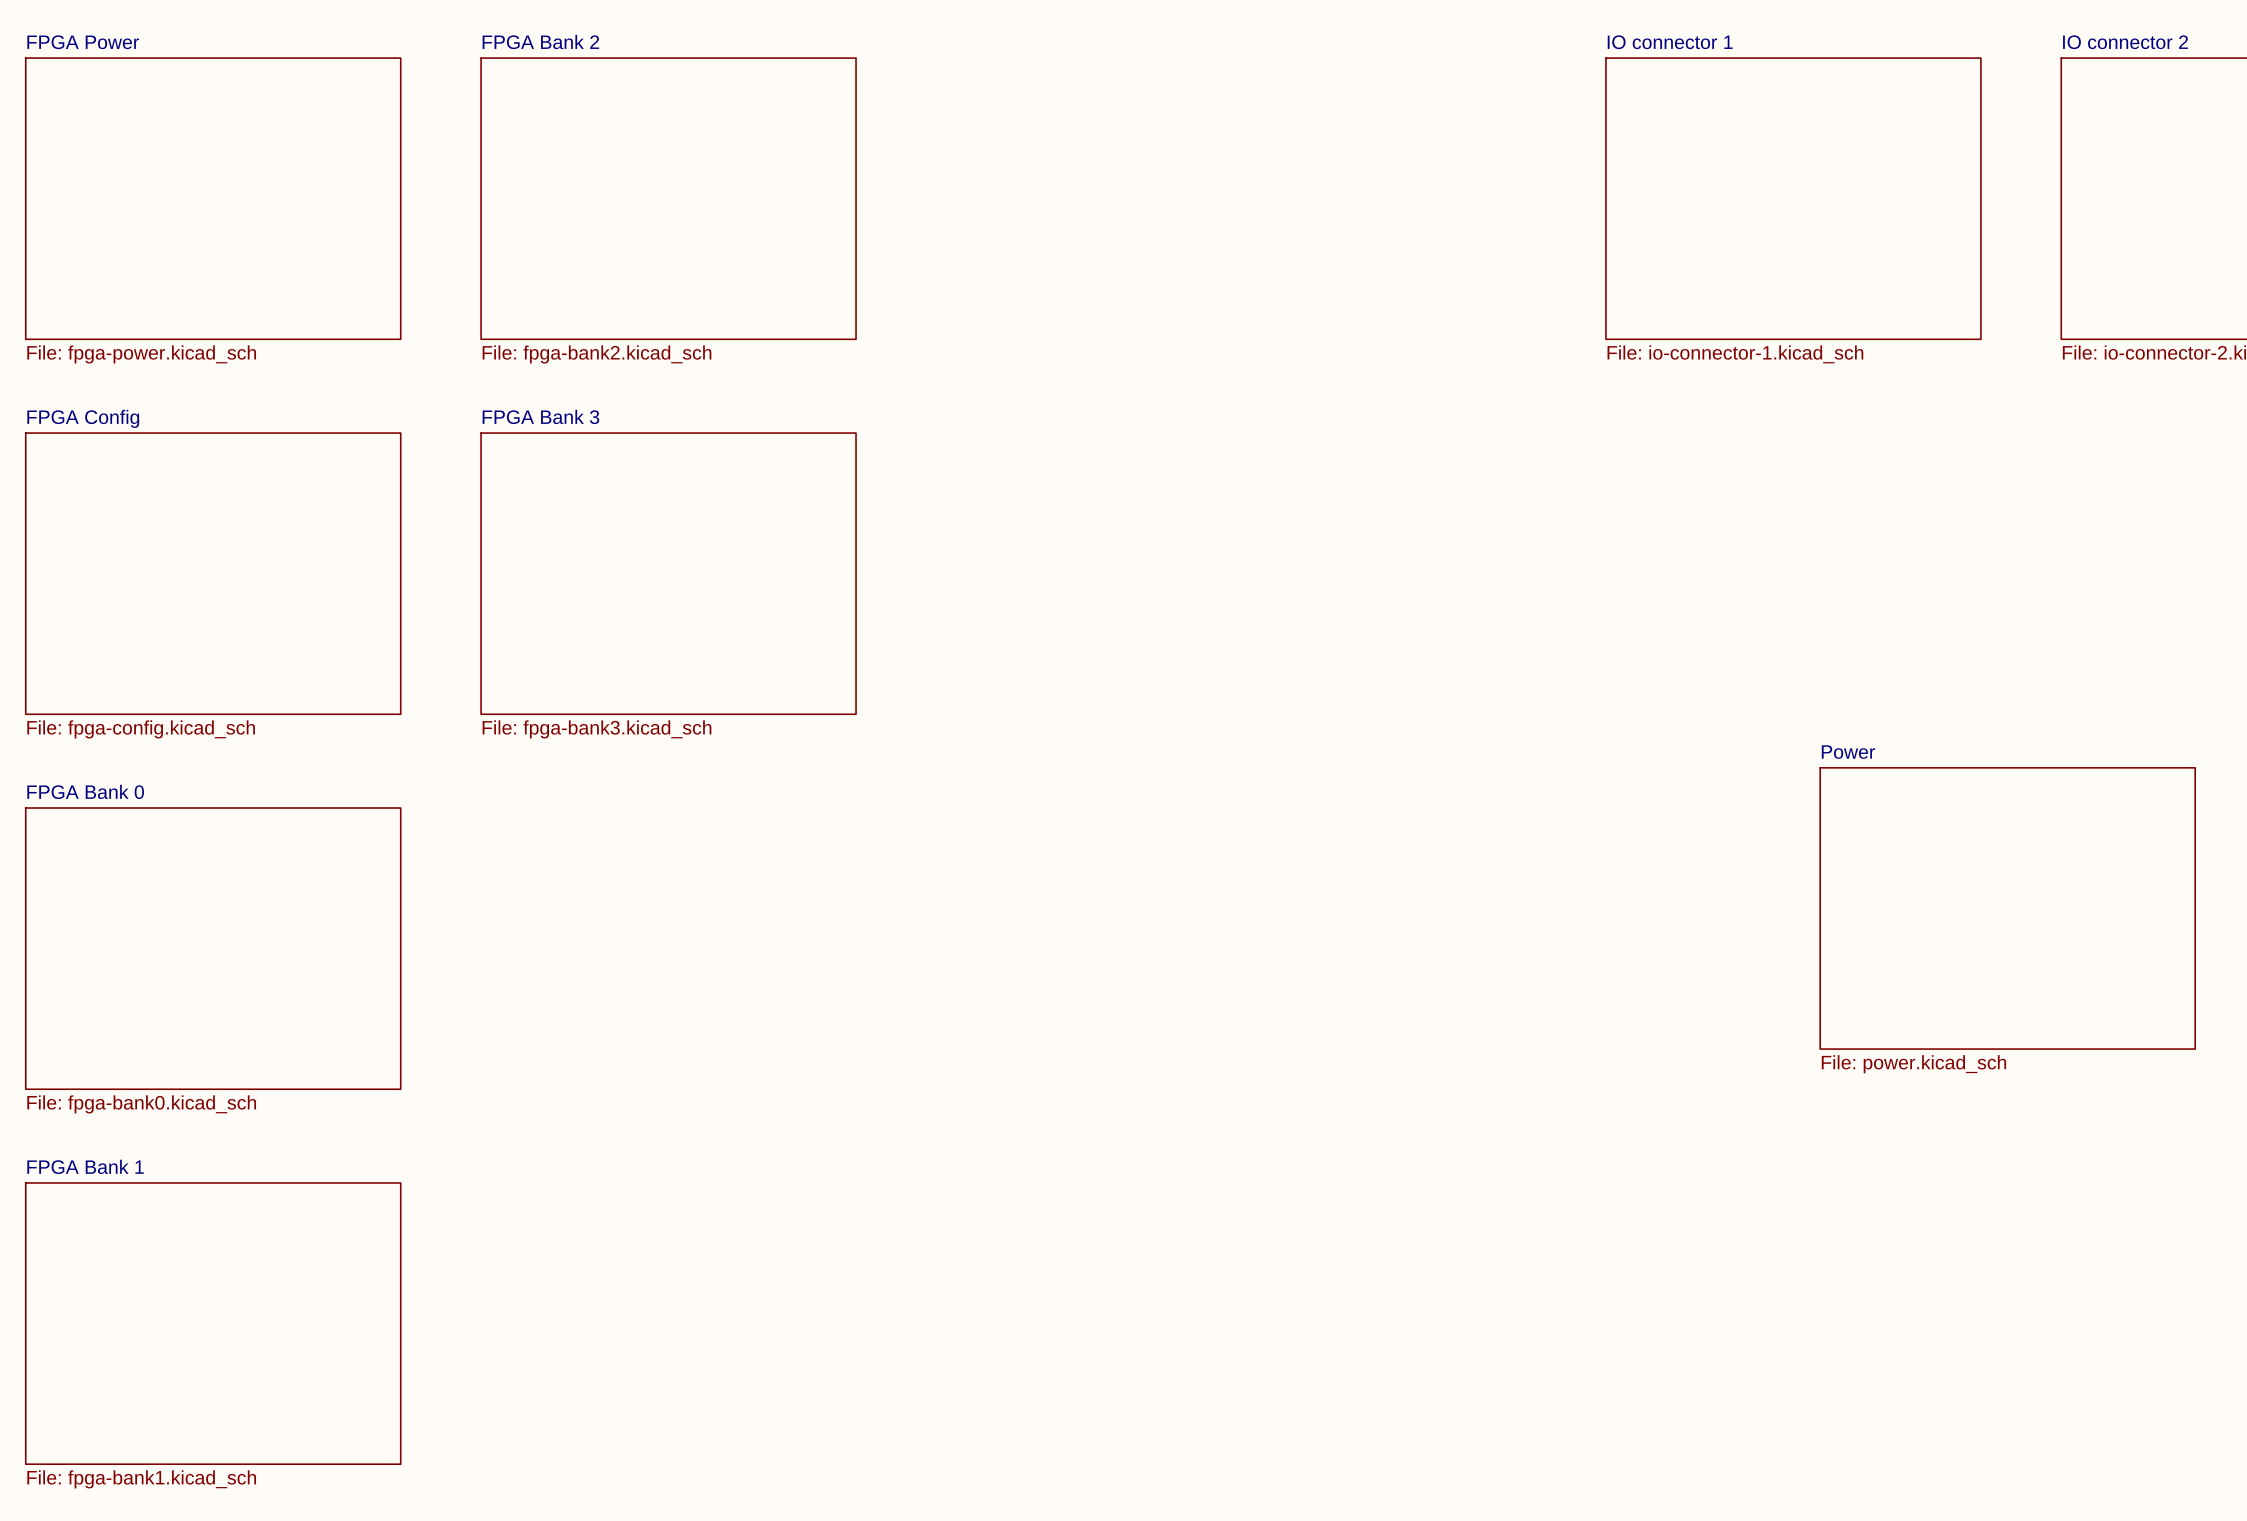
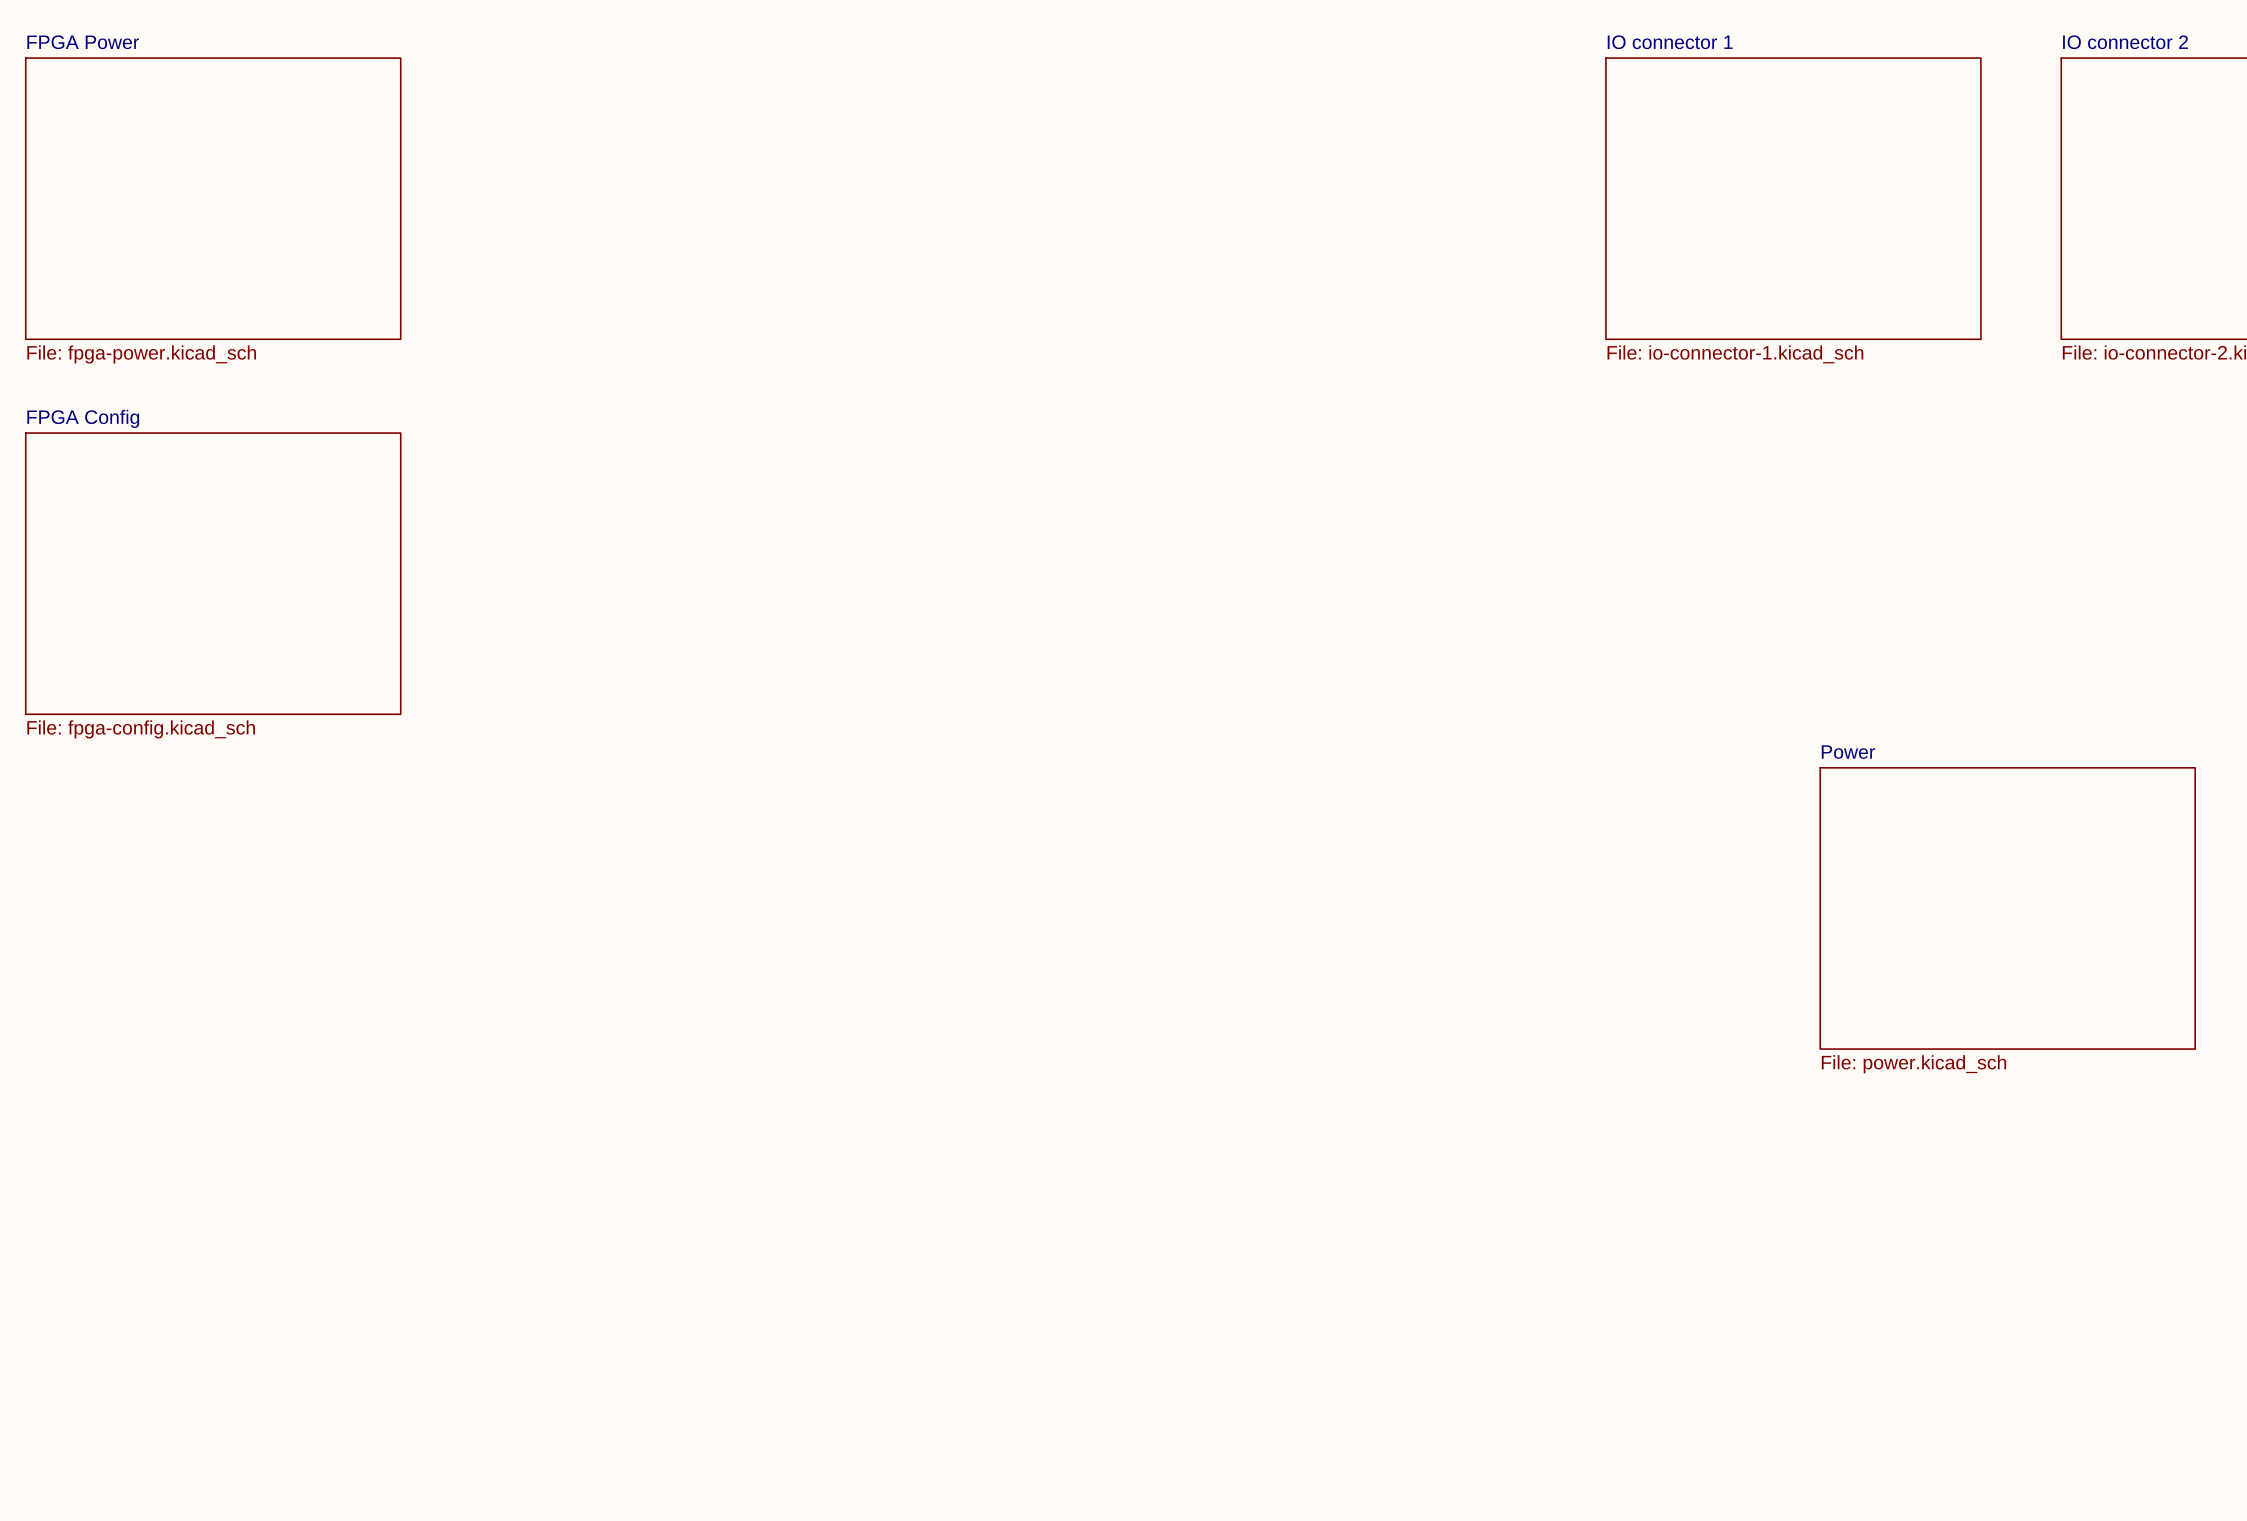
sheet FPGA Bank 2: File: fpga-bank2.kicad_sch (668, 198) -> none
sheet FPGA Bank 3: File: fpga-bank3.kicad_sch (668, 573) -> none
sheet FPGA Bank 0: File: fpga-bank0.kicad_sch (213, 948) -> none
sheet FPGA Bank 1: File: fpga-bank1.kicad_sch (213, 1323) -> none

